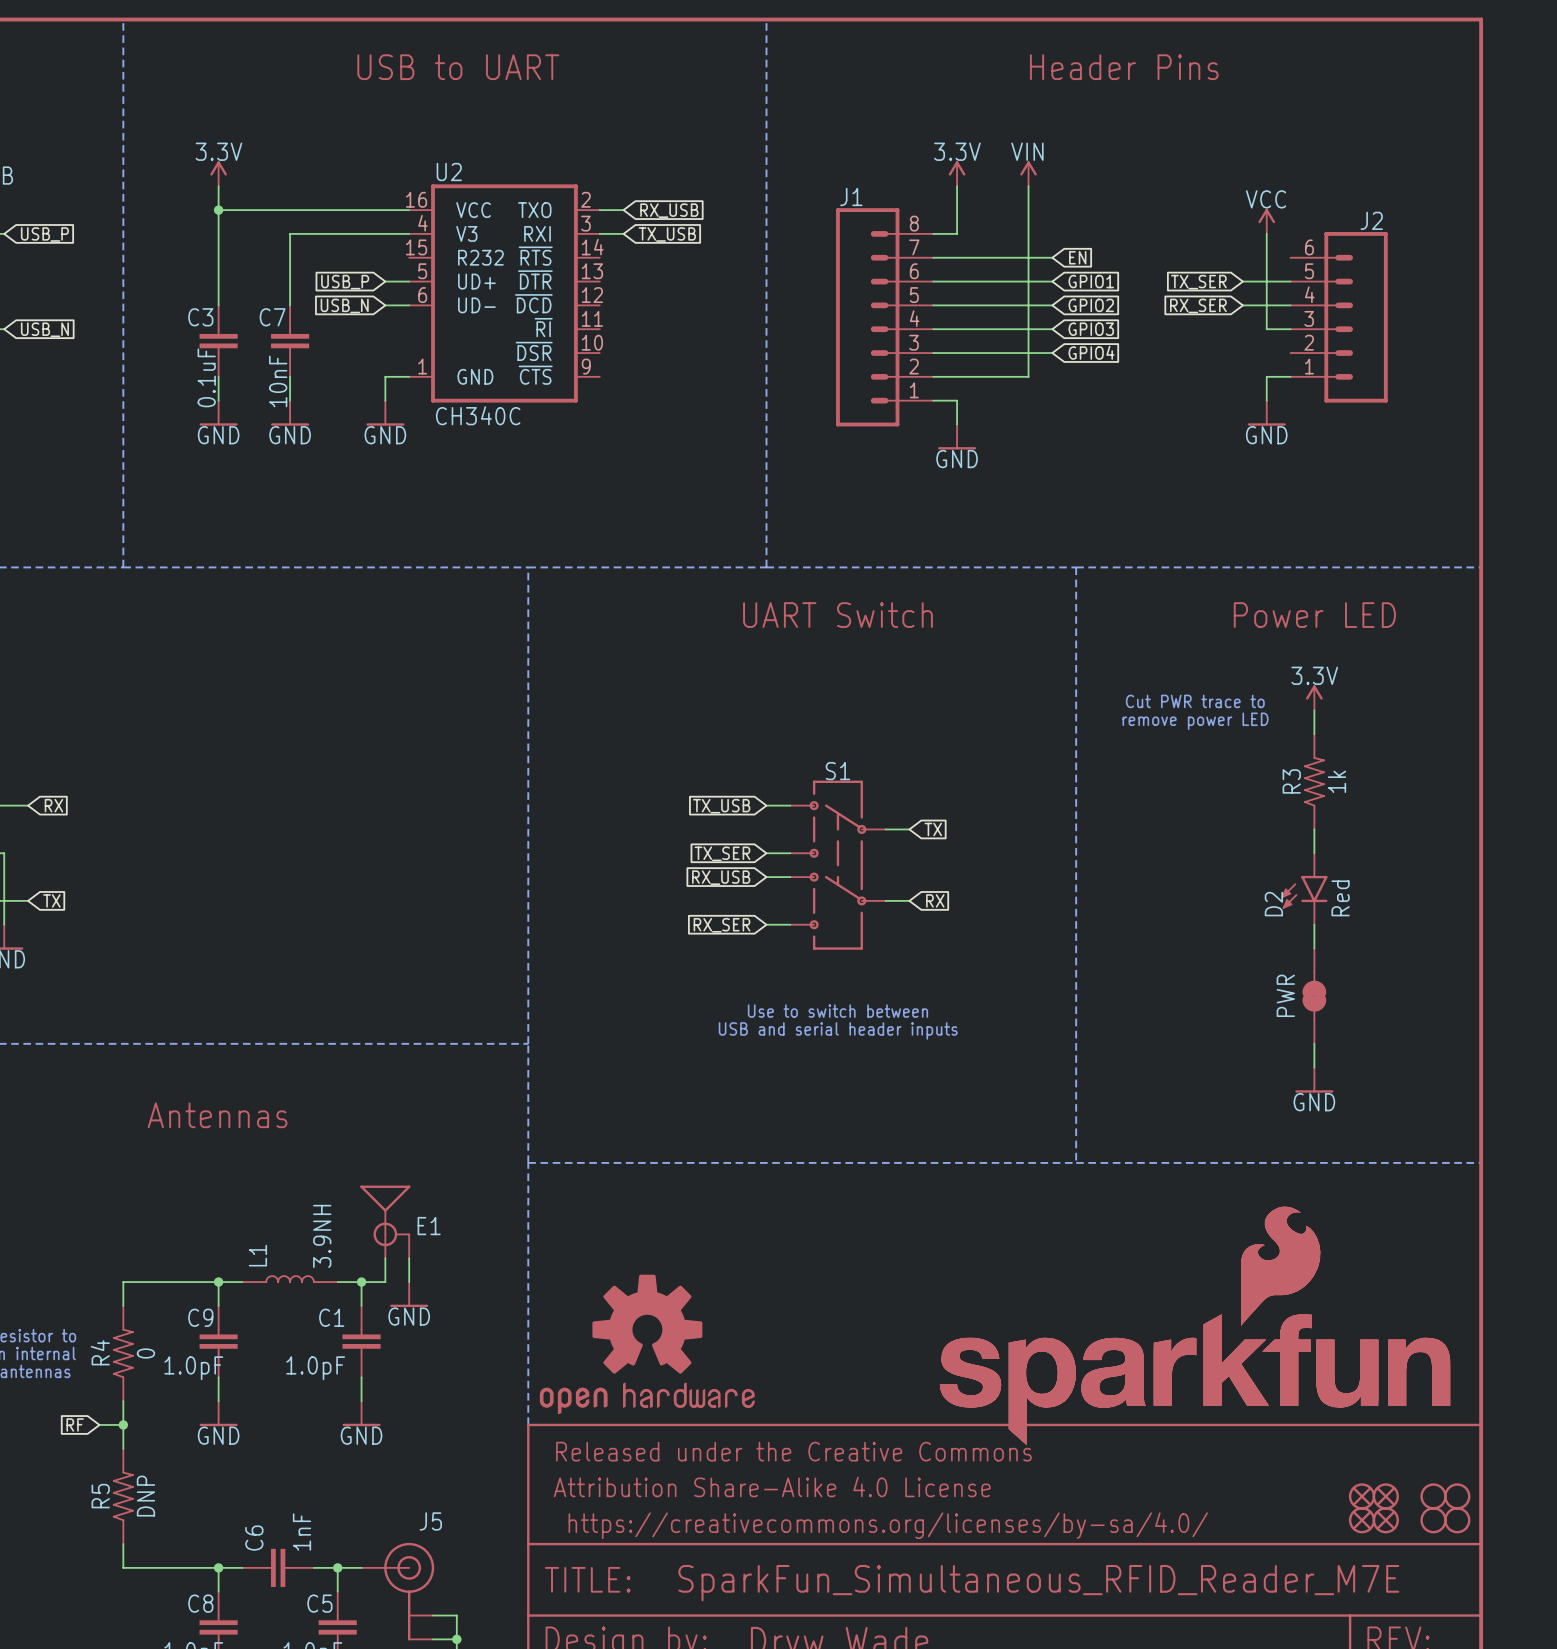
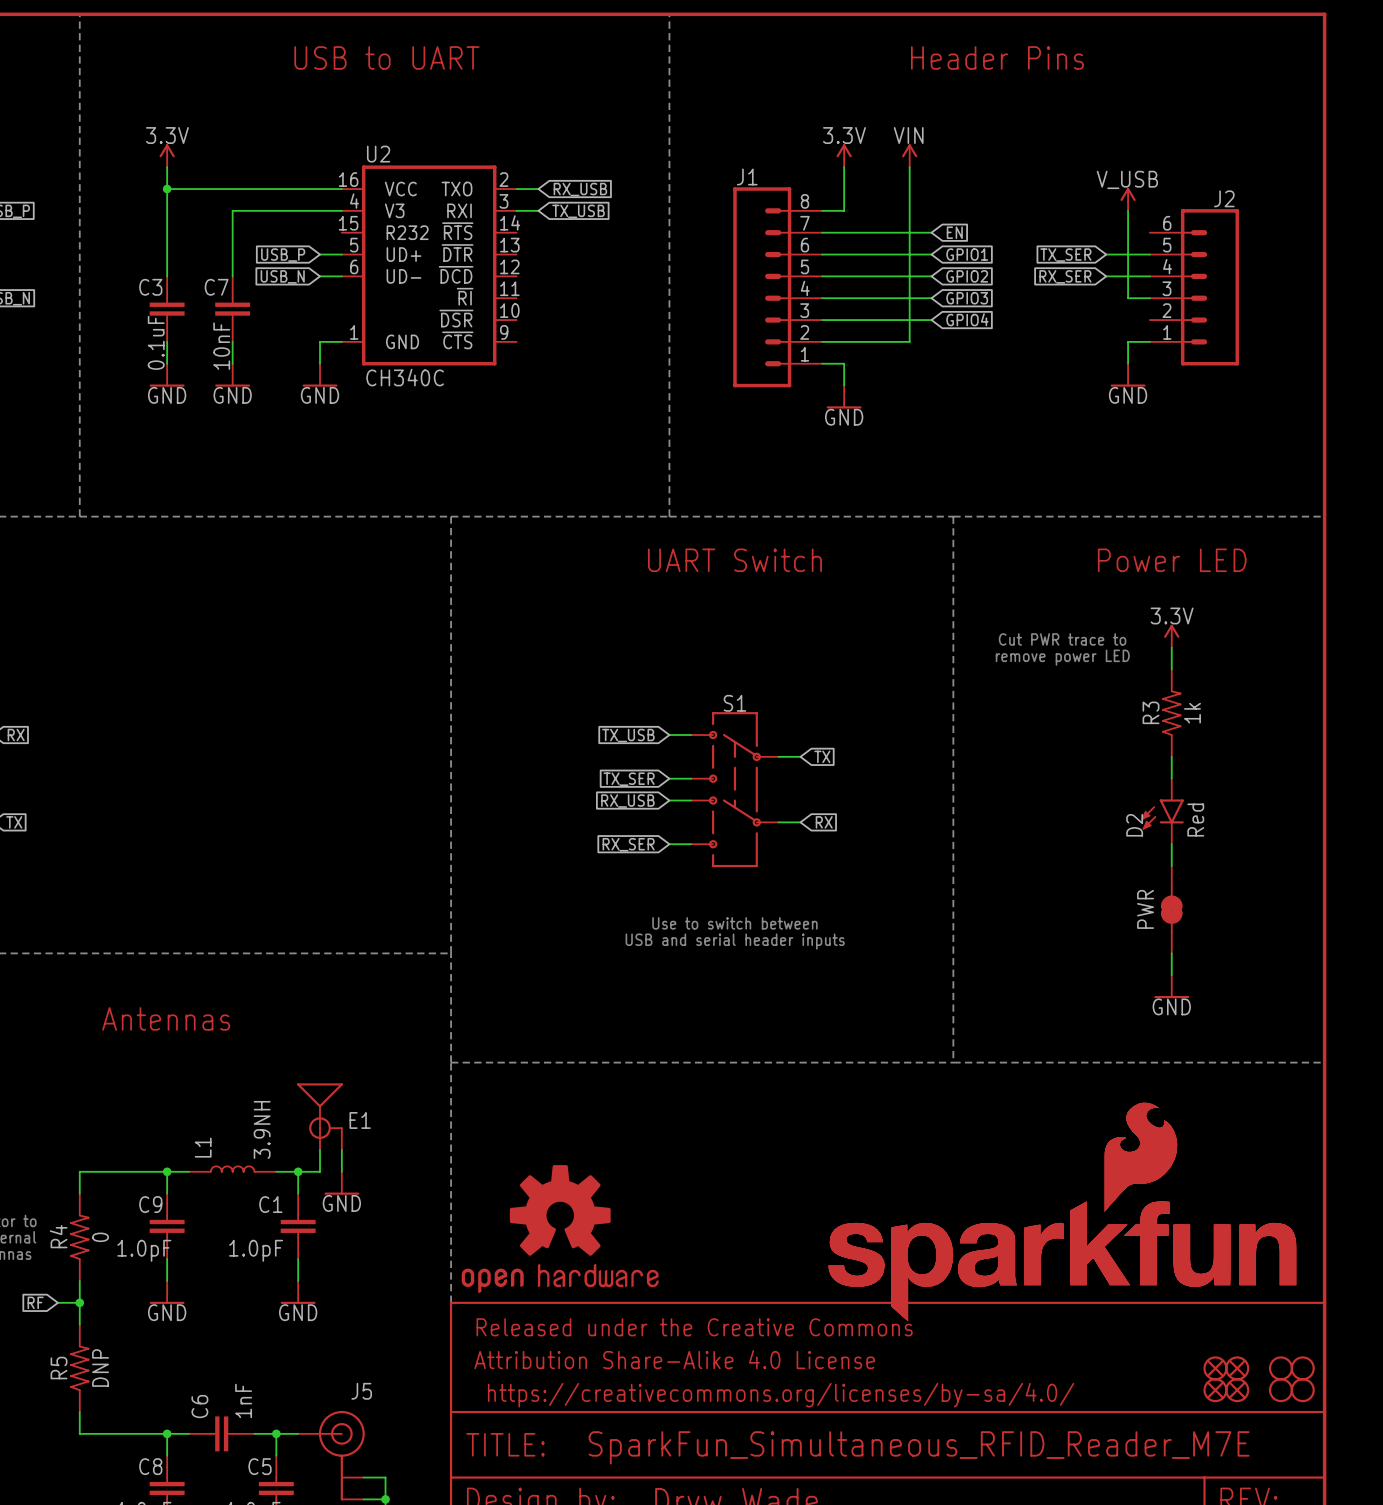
power symbol: VCC (1266, 221) -> V_USB (1128, 199)

